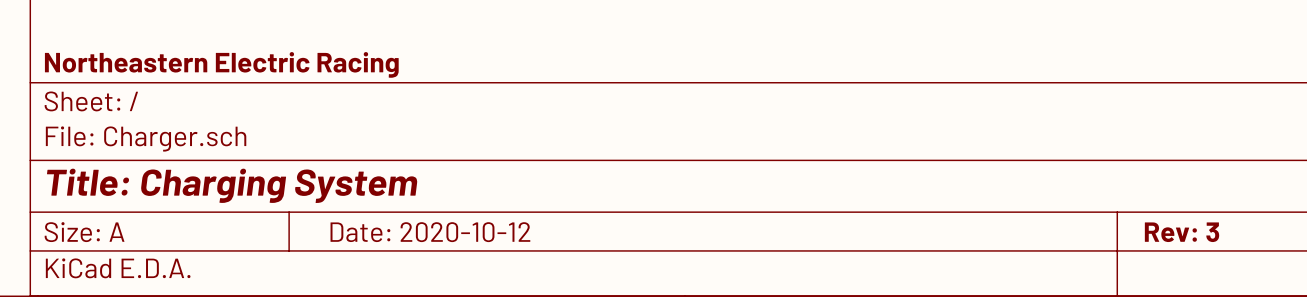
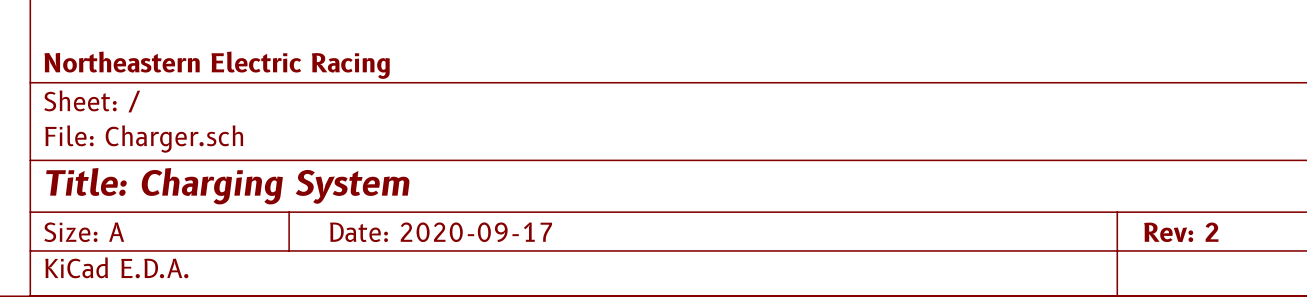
title block: Date: 2020-10-12 (430, 232) -> Date: 2020-09-17 (441, 232)
title block: Rev: 3 (1182, 232) -> Rev: 2 (1181, 232)

